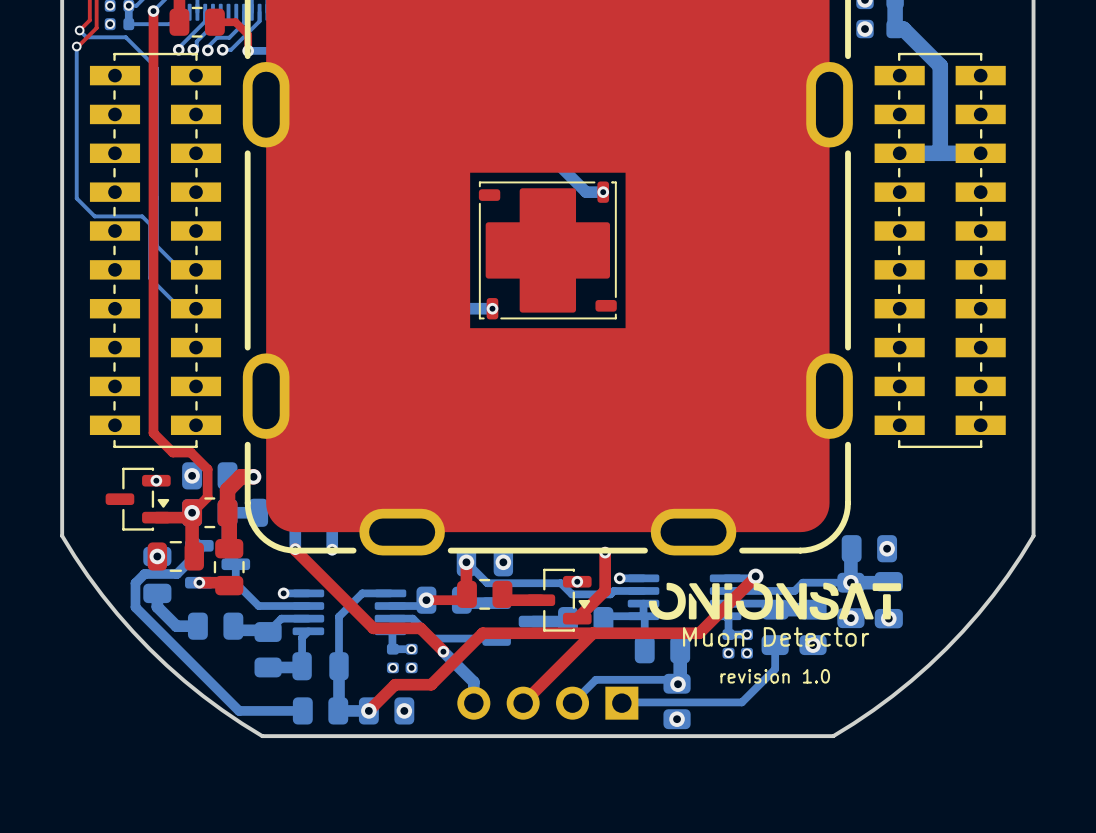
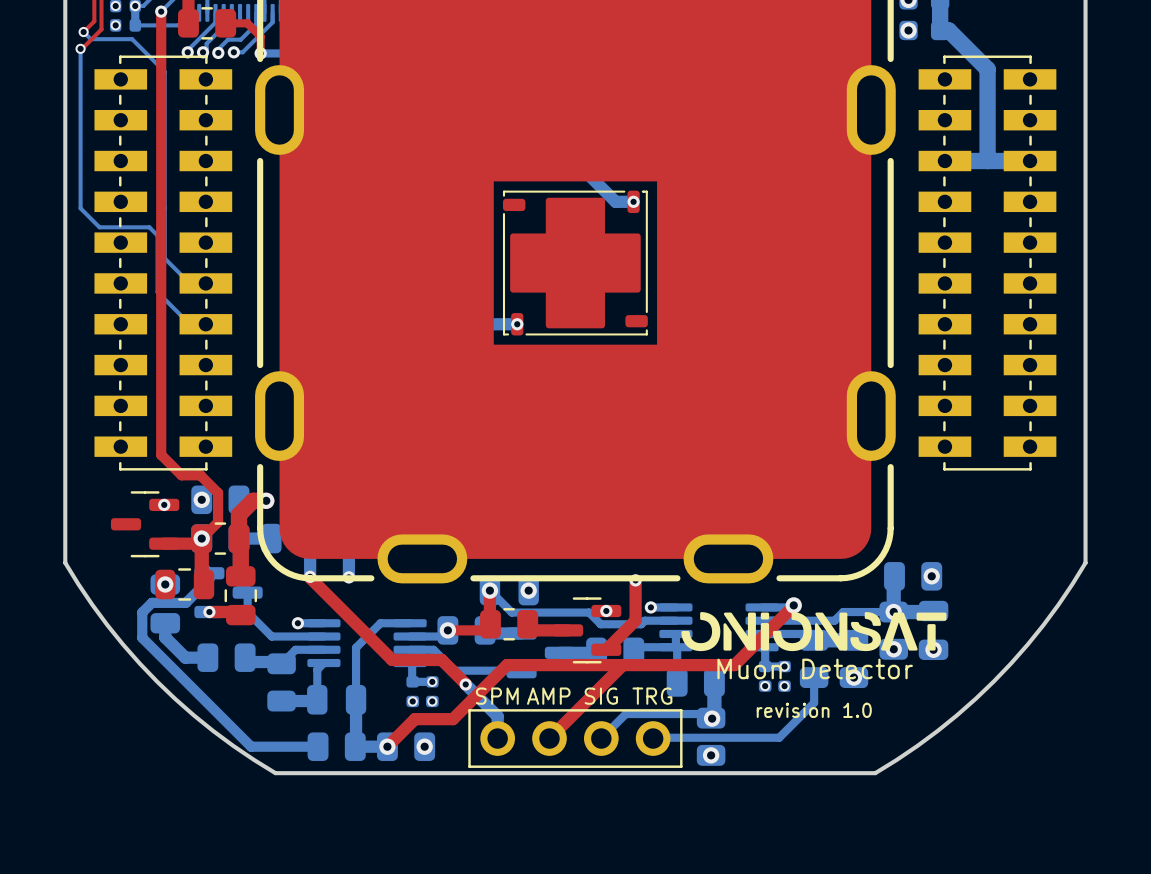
part footprint: [105, 467, 171, 531] -> [110, 491, 180, 558]
part footprint: [526, 568, 592, 632] -> [553, 597, 622, 664]
text: none -> SPM (497, 696)
text: none -> AMP (548, 696)
text: none -> SIG (601, 696)
text: none -> TRG (652, 696)
part footprint: [457, 686, 639, 720] -> [468, 709, 683, 768]

